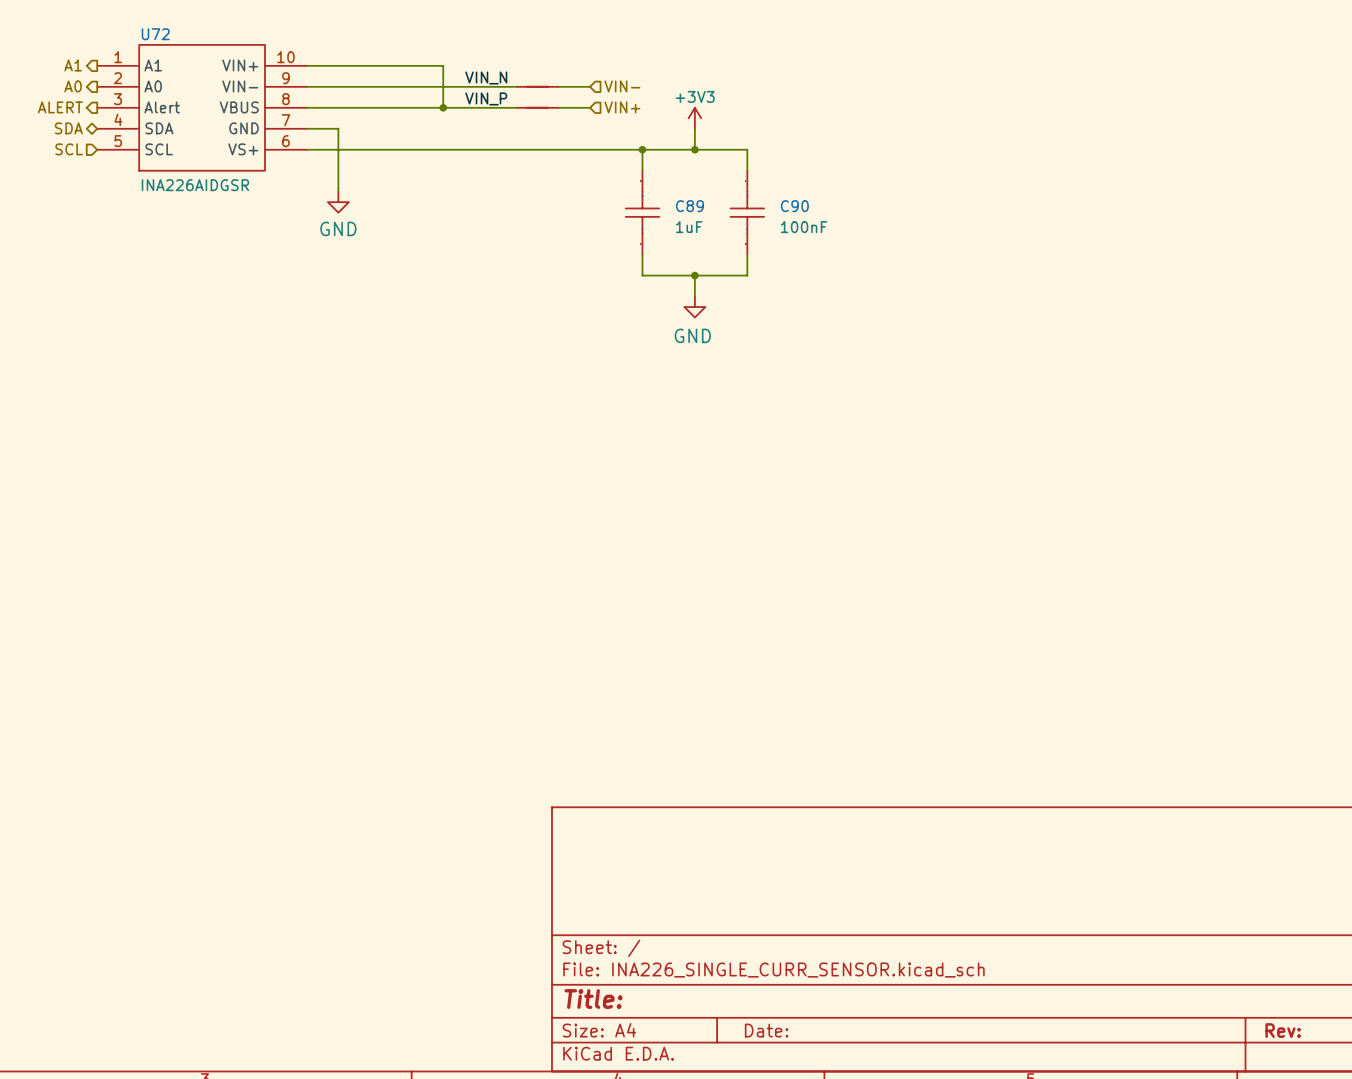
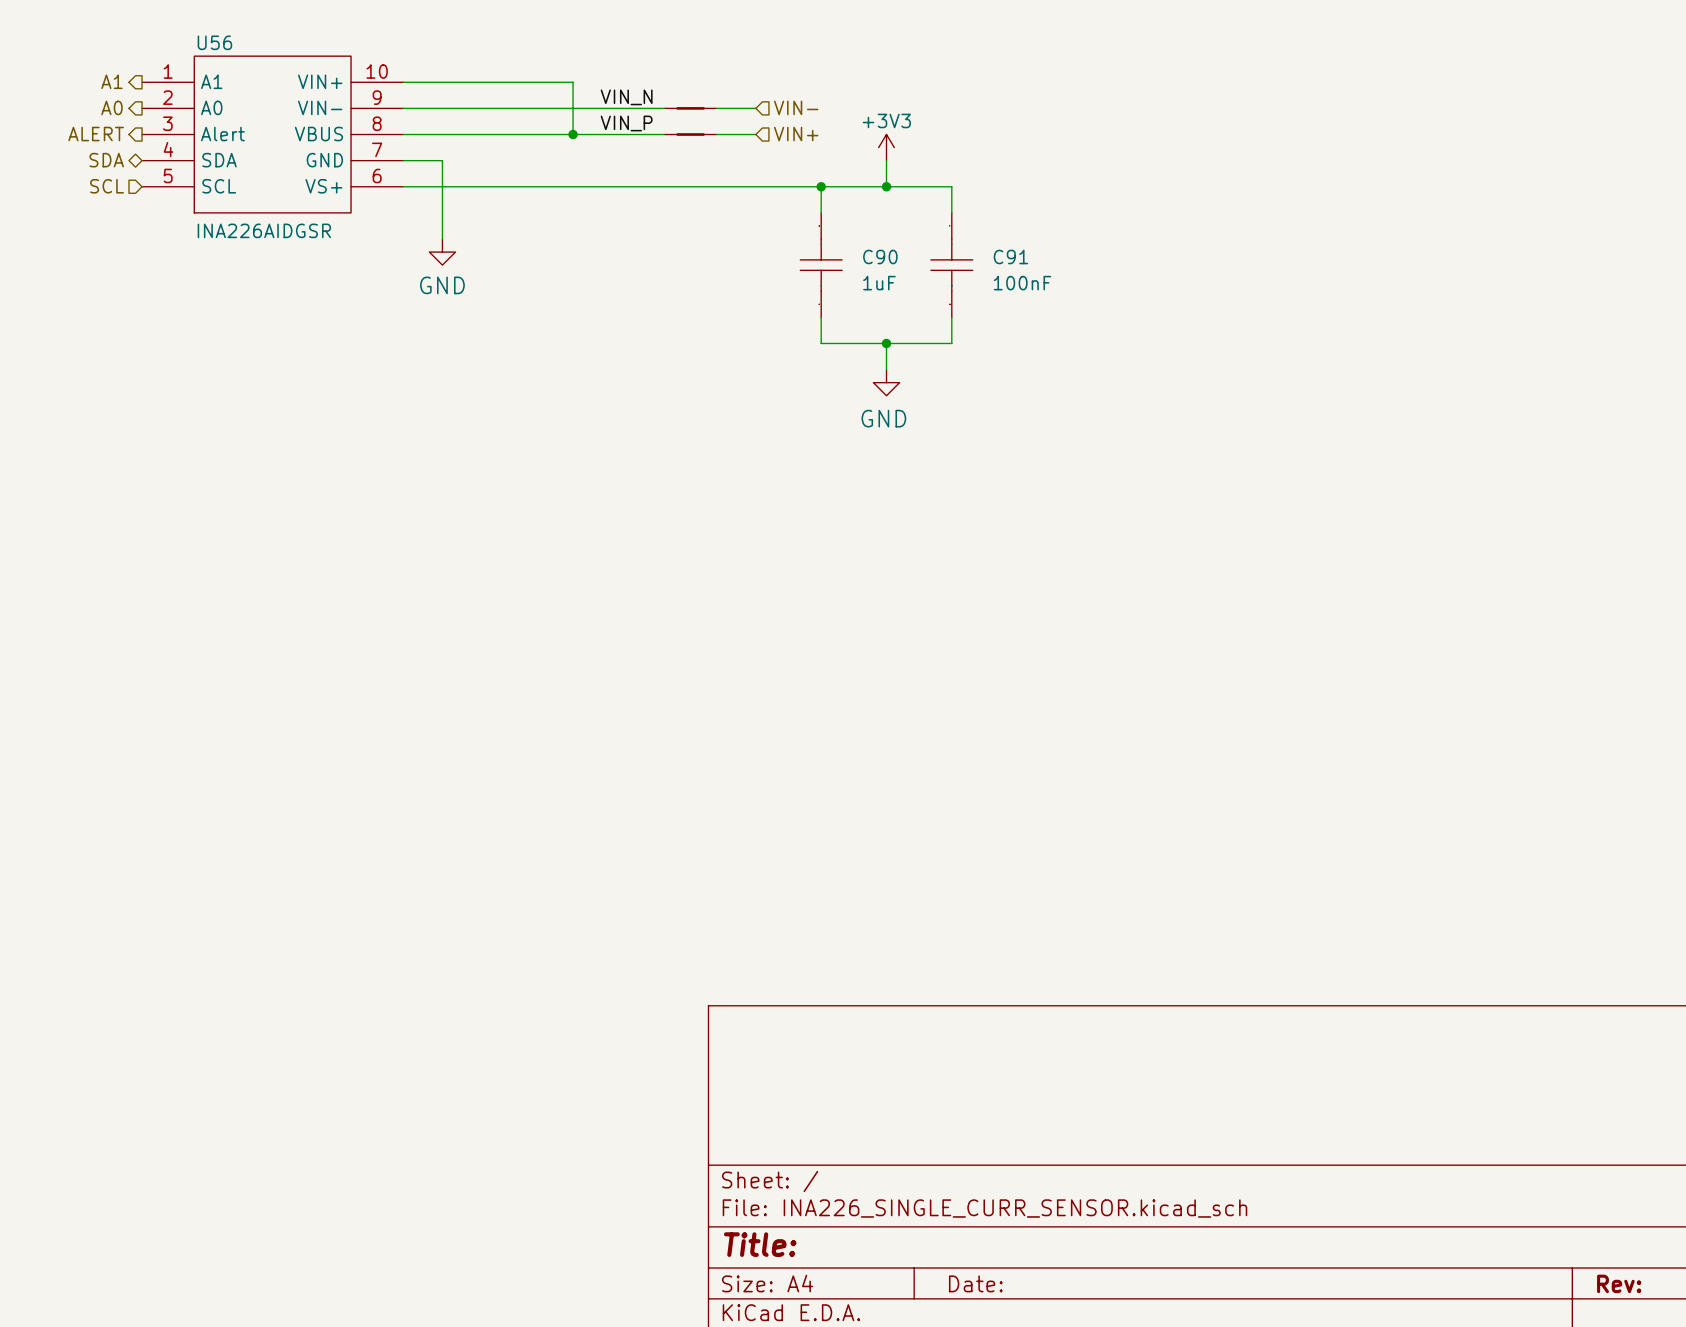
U72 name: U72 (155, 34) -> U56 (214, 42)
C89 name: C89 (689, 206) -> C90 (880, 256)
C90 name: C90 (794, 206) -> C91 (1010, 256)

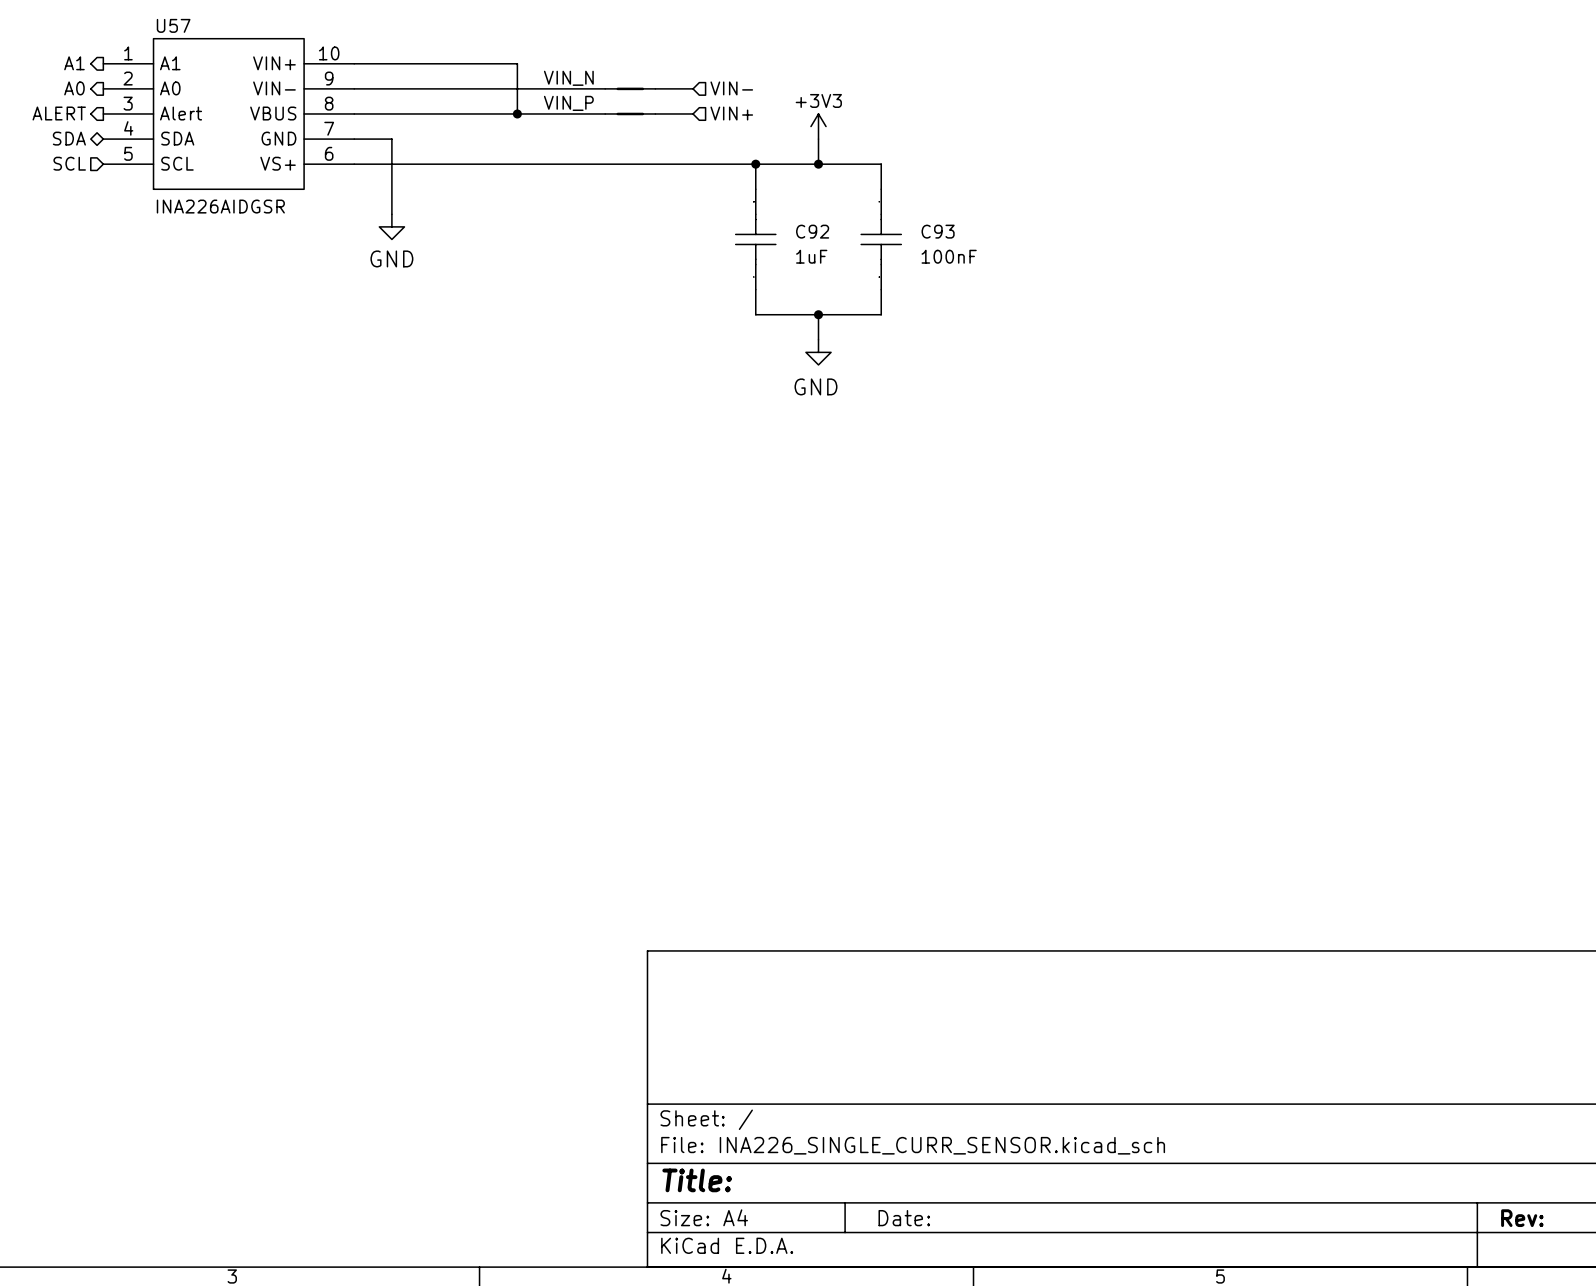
U56 name: U56 (214, 42) -> U57 (173, 25)
C90 name: C90 (880, 256) -> C92 (812, 231)
C91 name: C91 (1010, 256) -> C93 (938, 231)

